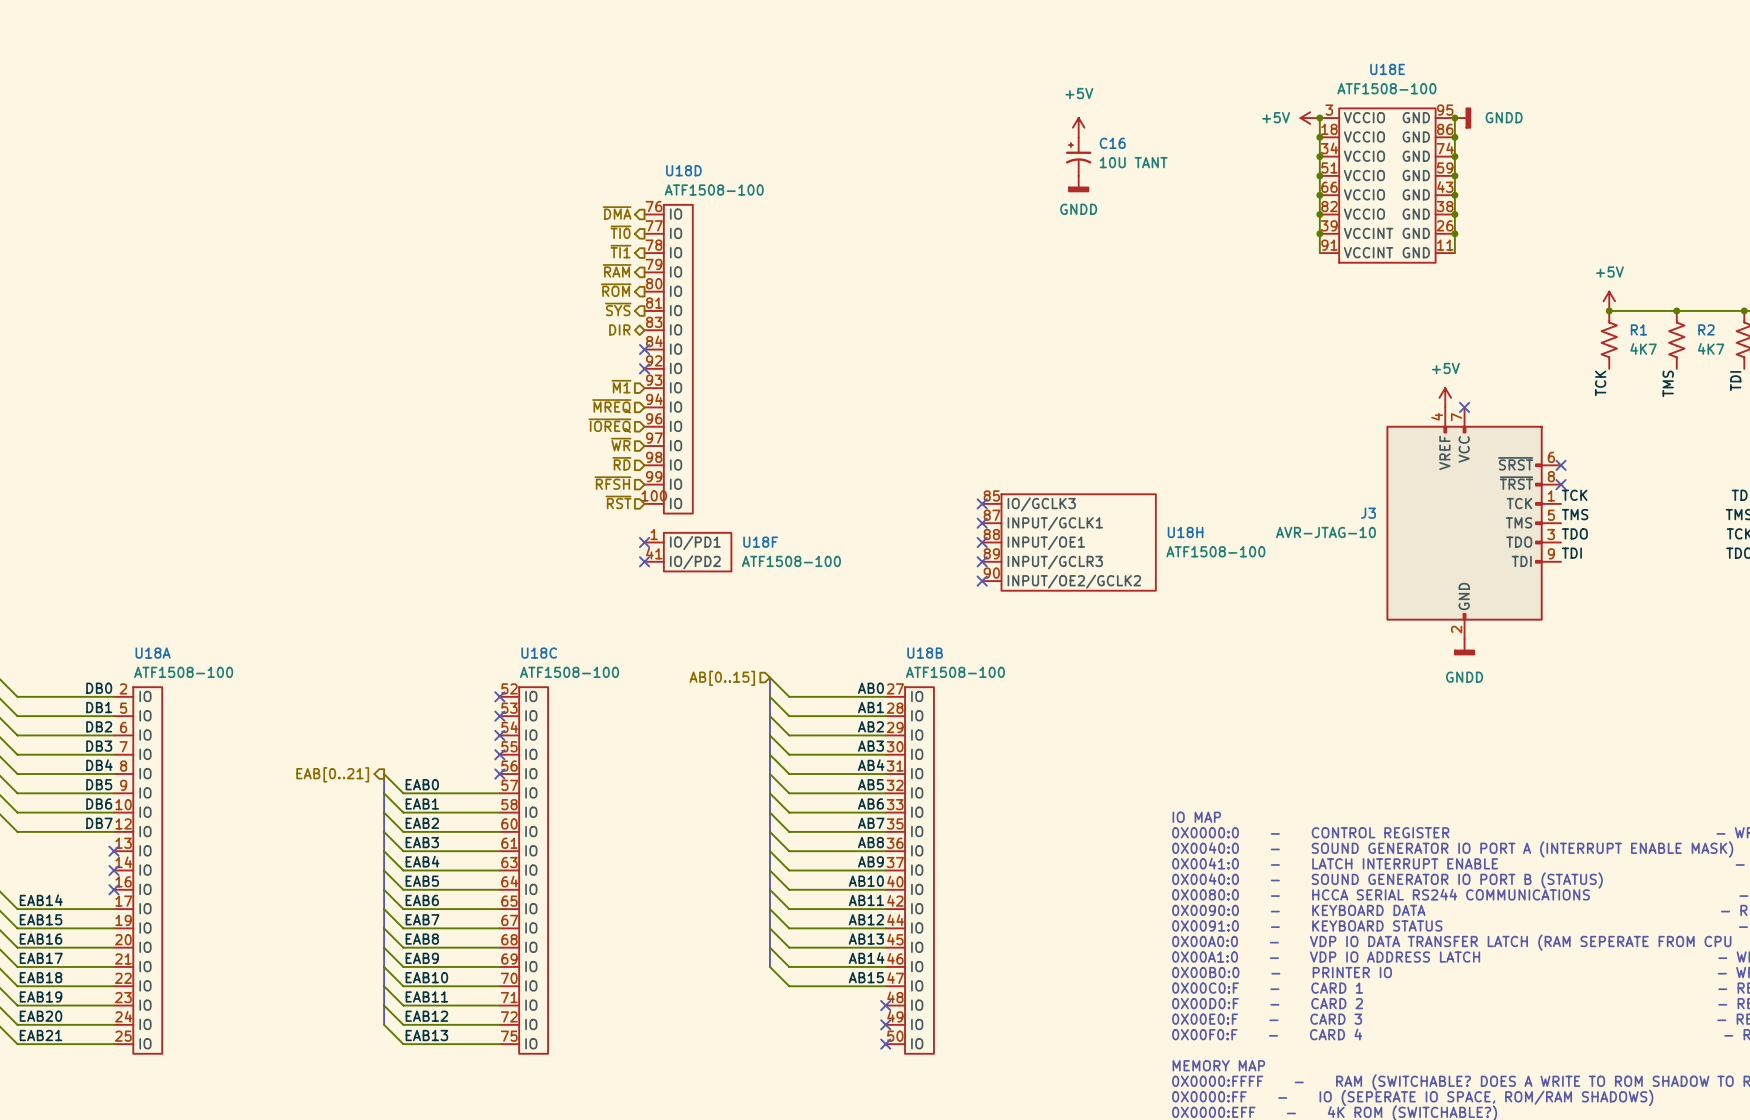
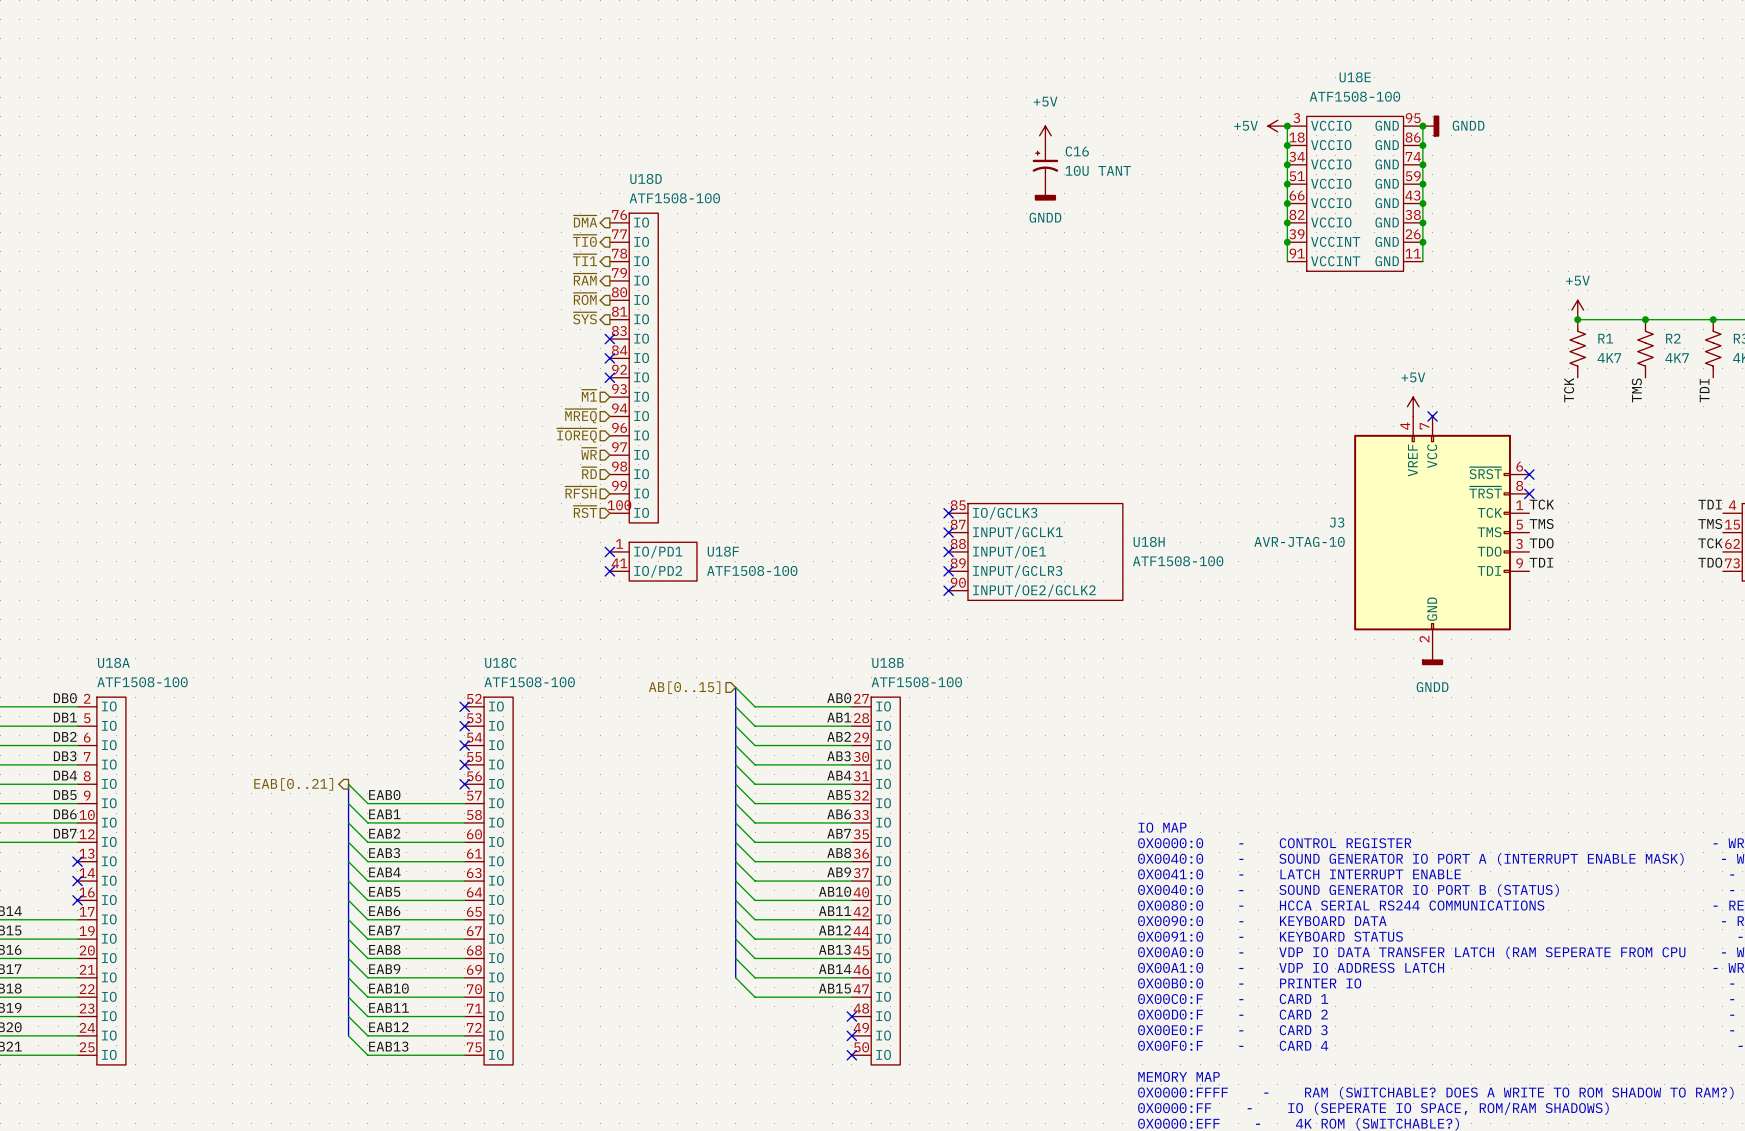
hierarchical label: DIR (619, 329) -> none
no-connect mark: none -> (609, 339)

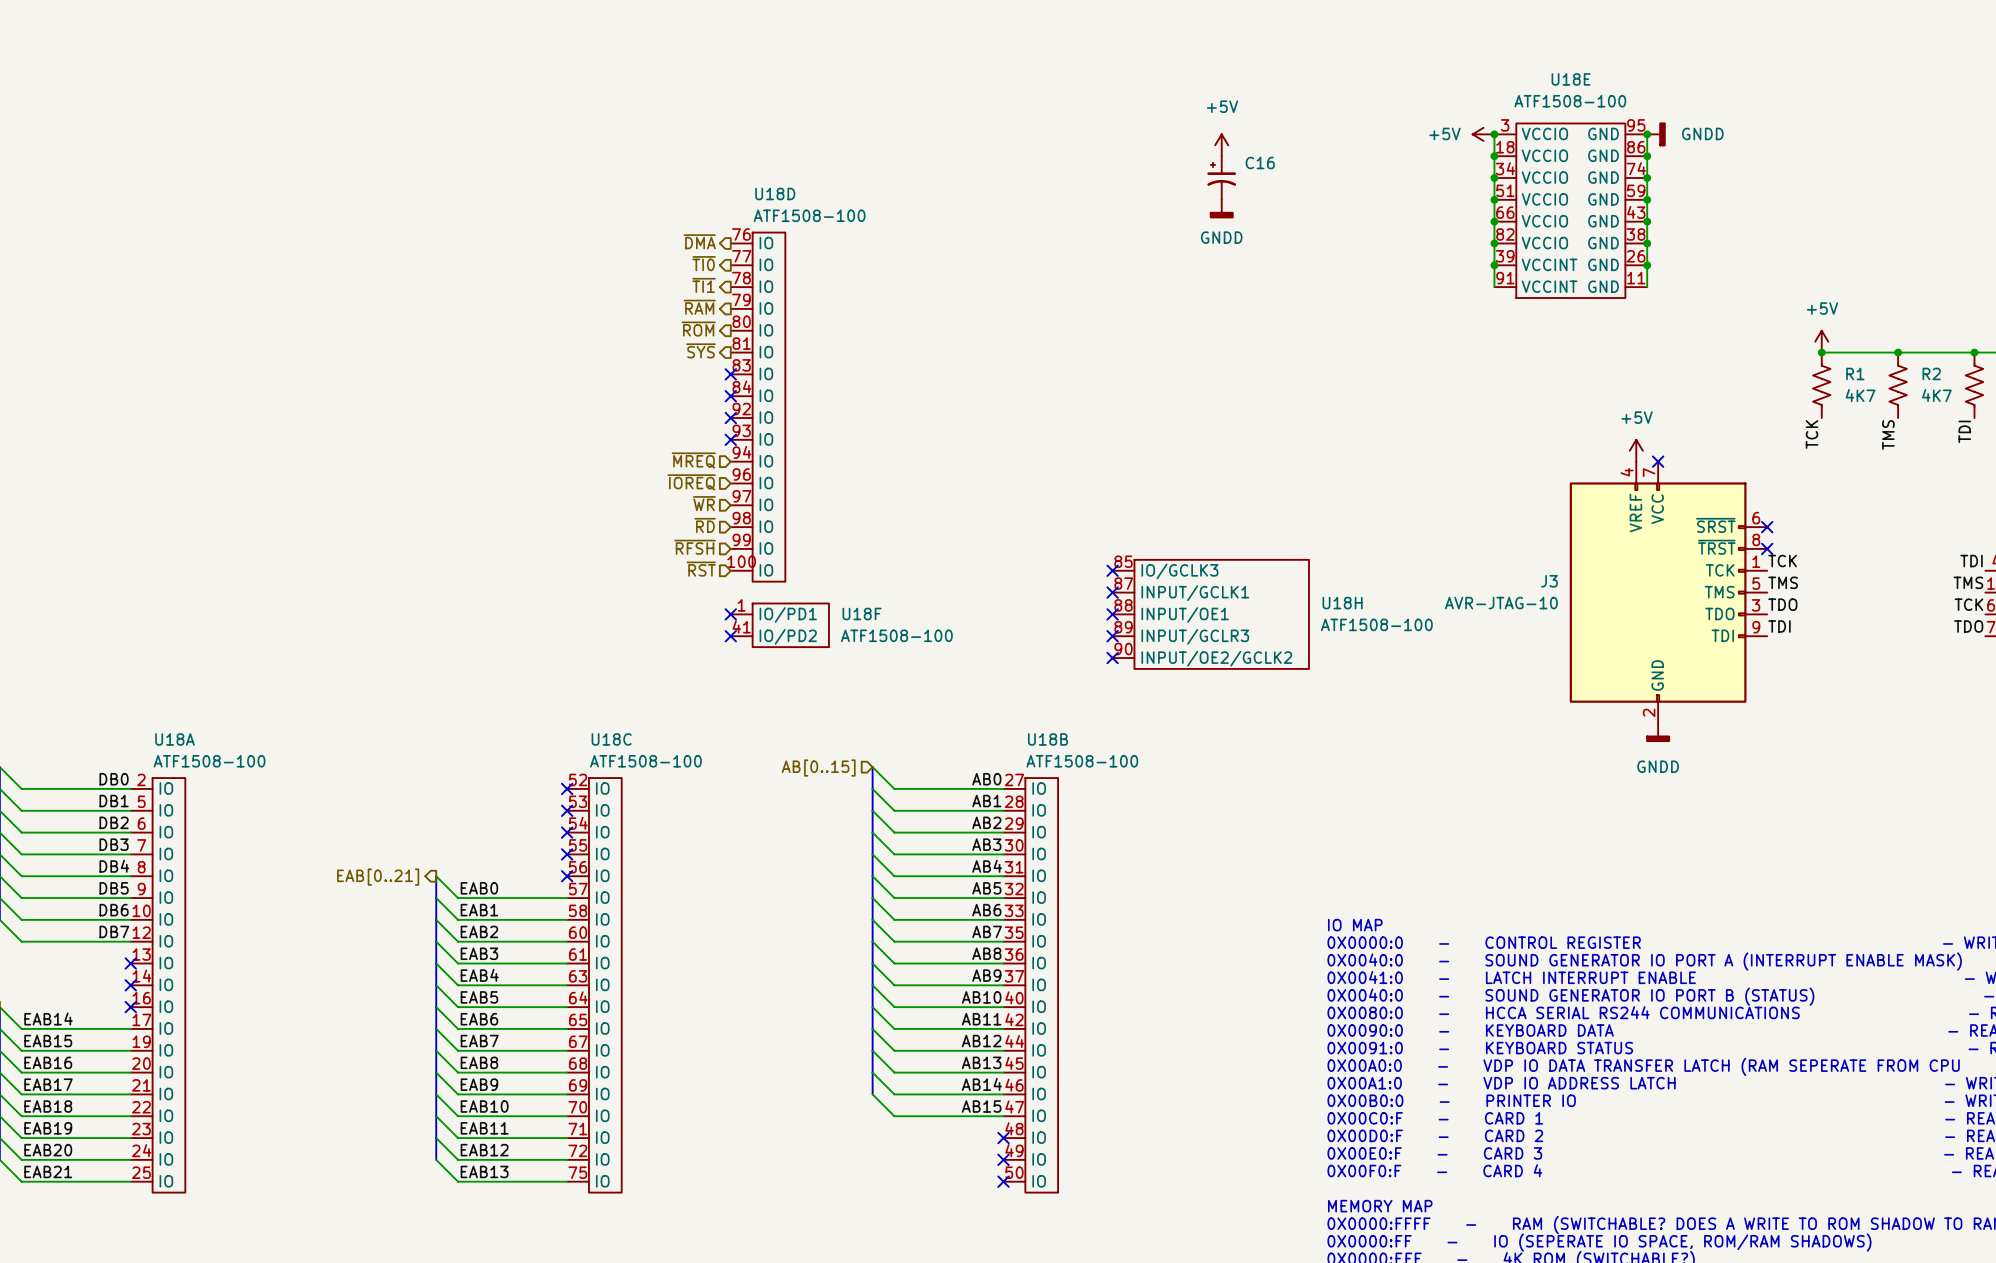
C16 value: 10U TANT (1098, 170) -> none
hierarchical label: ~{M1} (589, 395) -> none
no-connect mark: none -> (730, 439)

